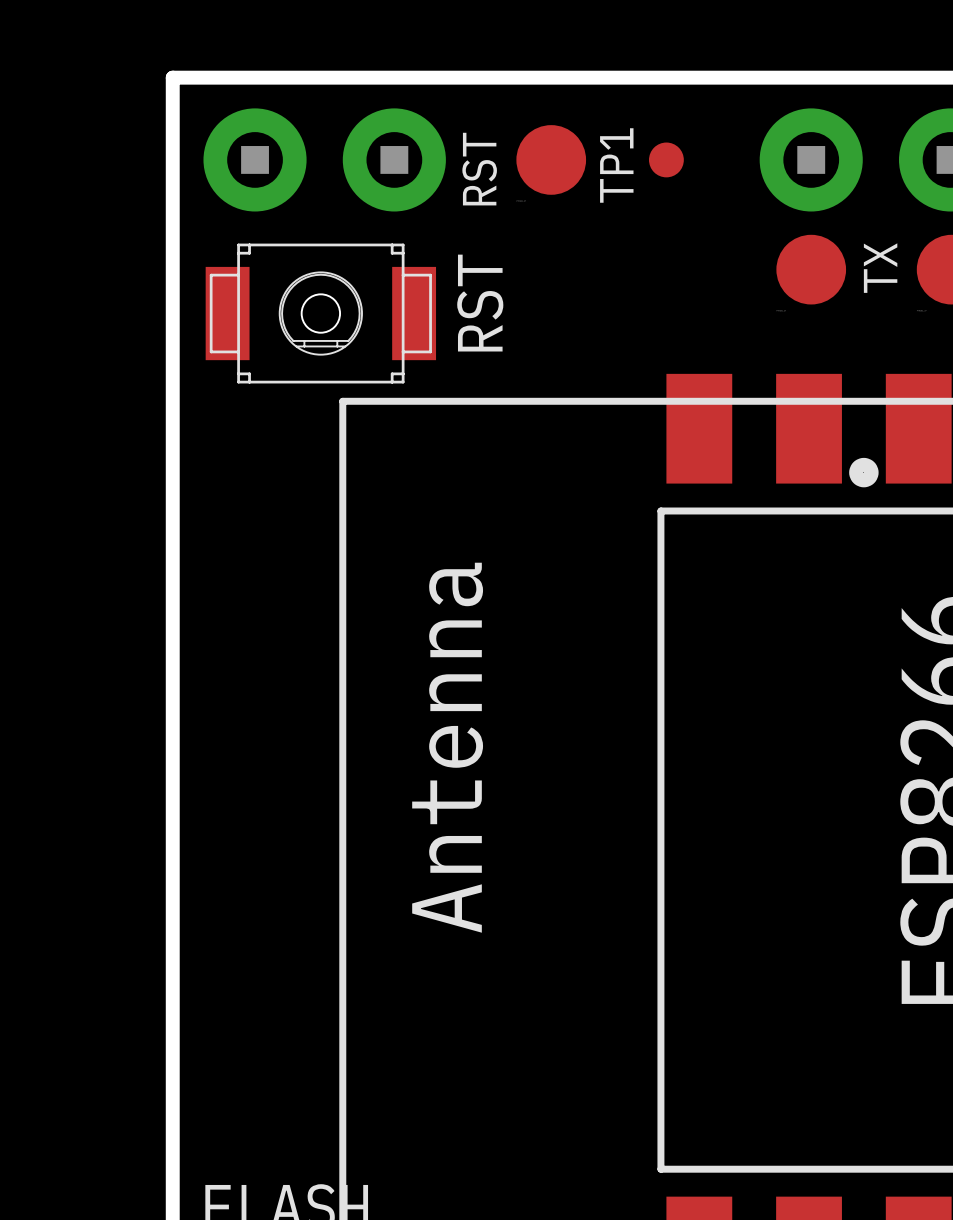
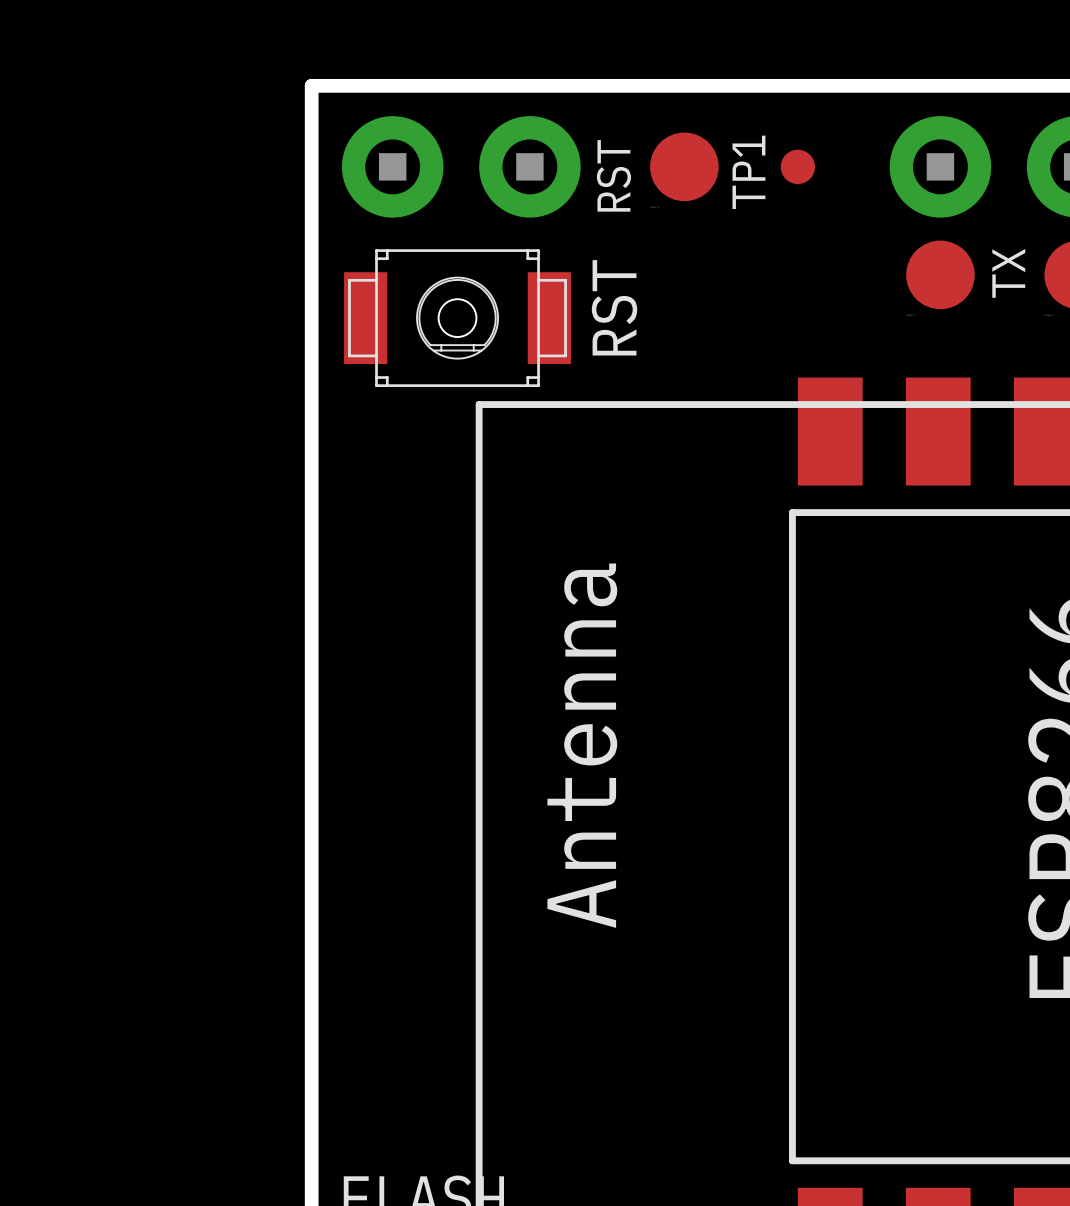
drawing: [849, 457, 879, 488] -> none

